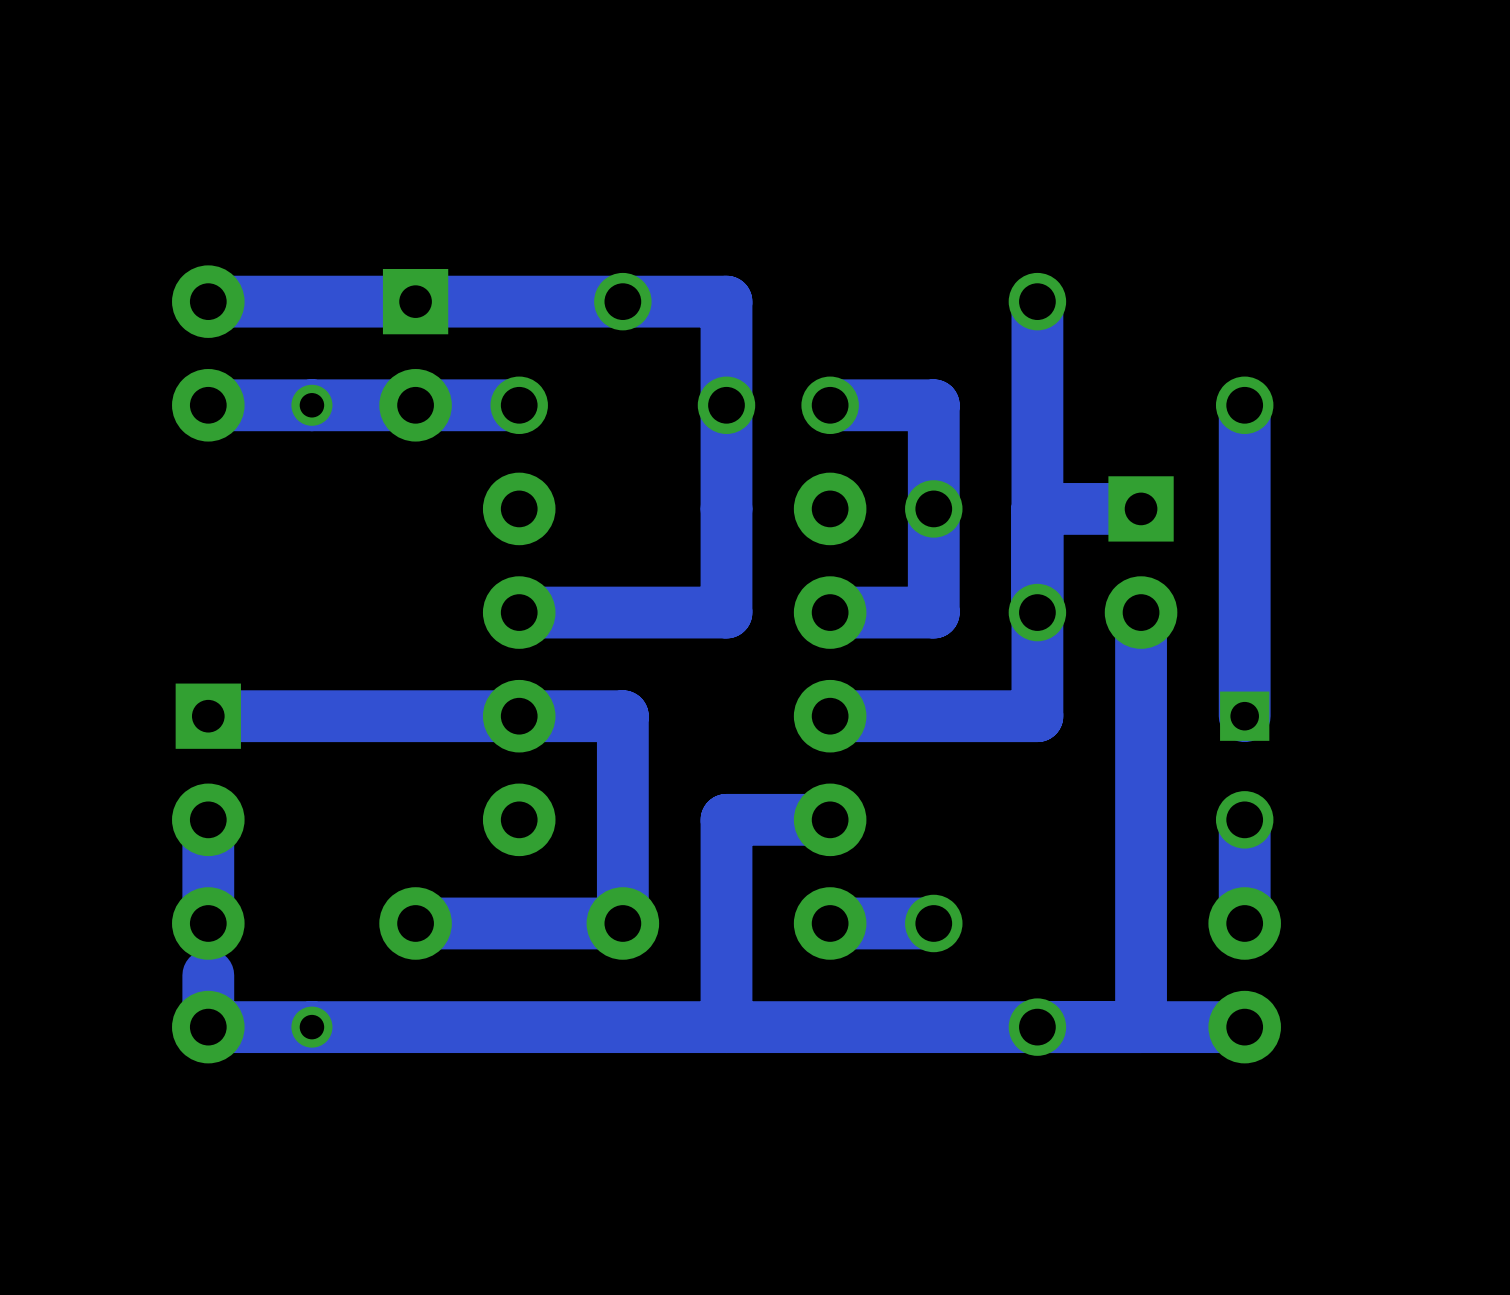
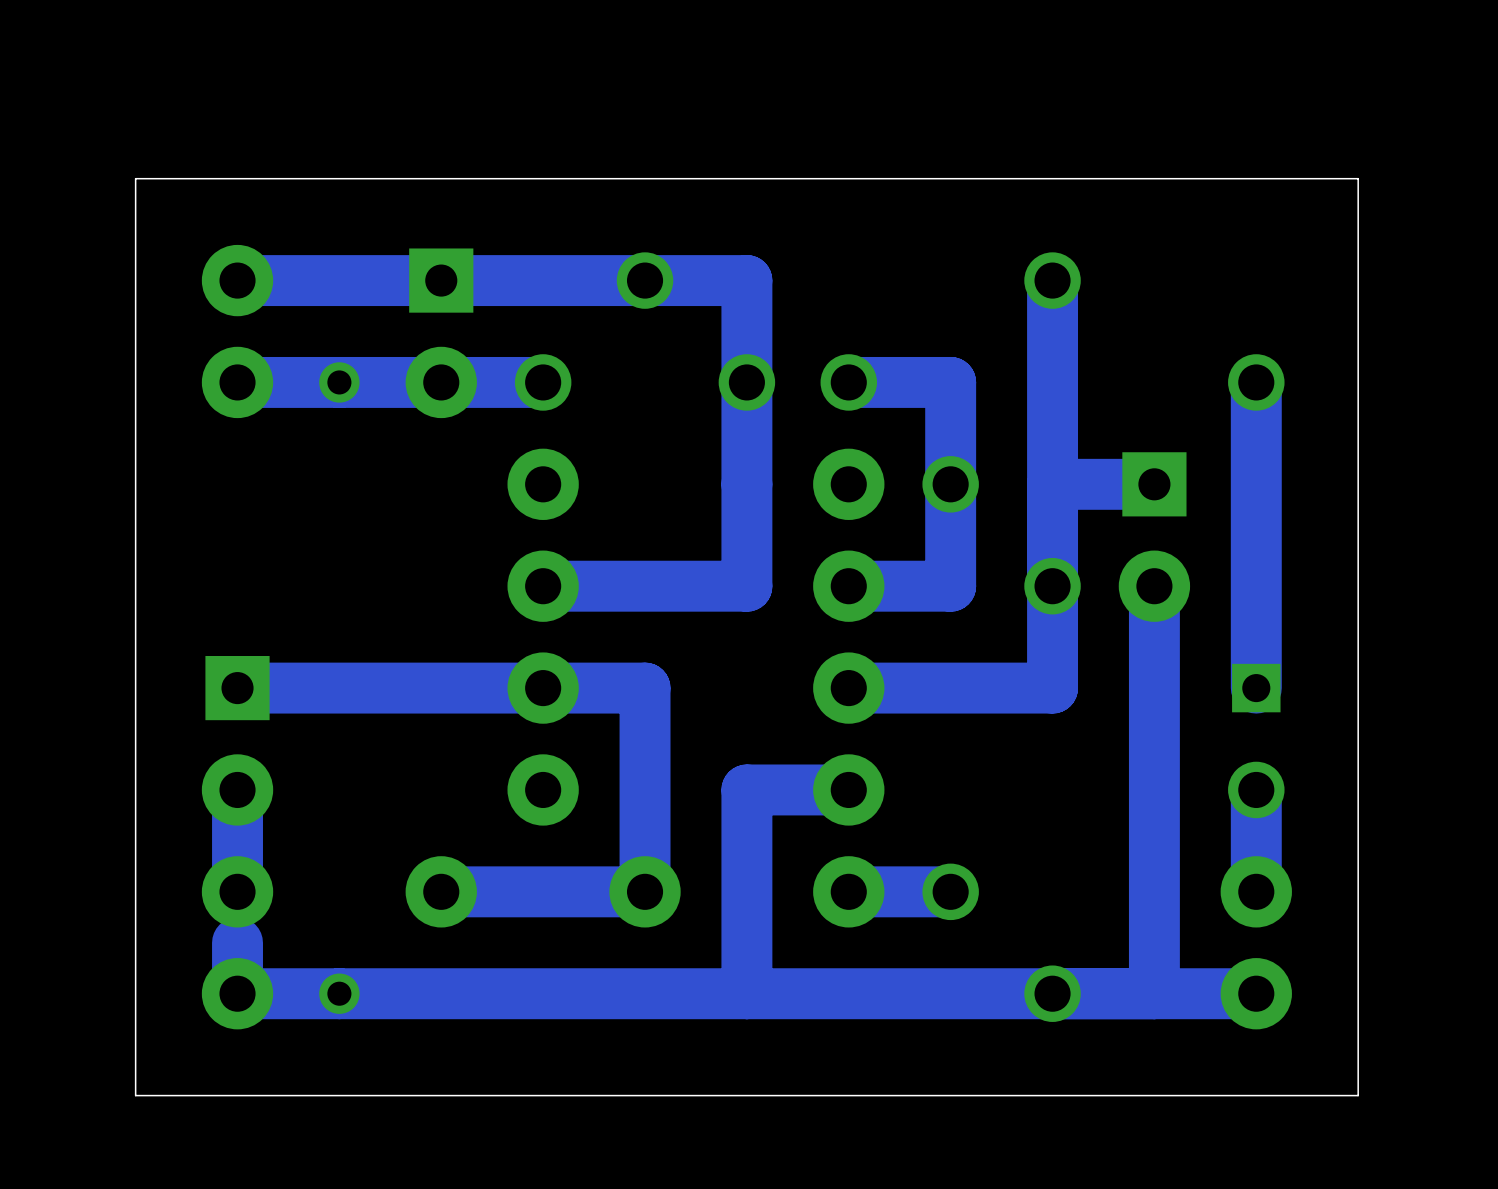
board edge: none -> (1358, 178) (135, 178) (135, 1095) (1358, 1095) (1358, 178)

